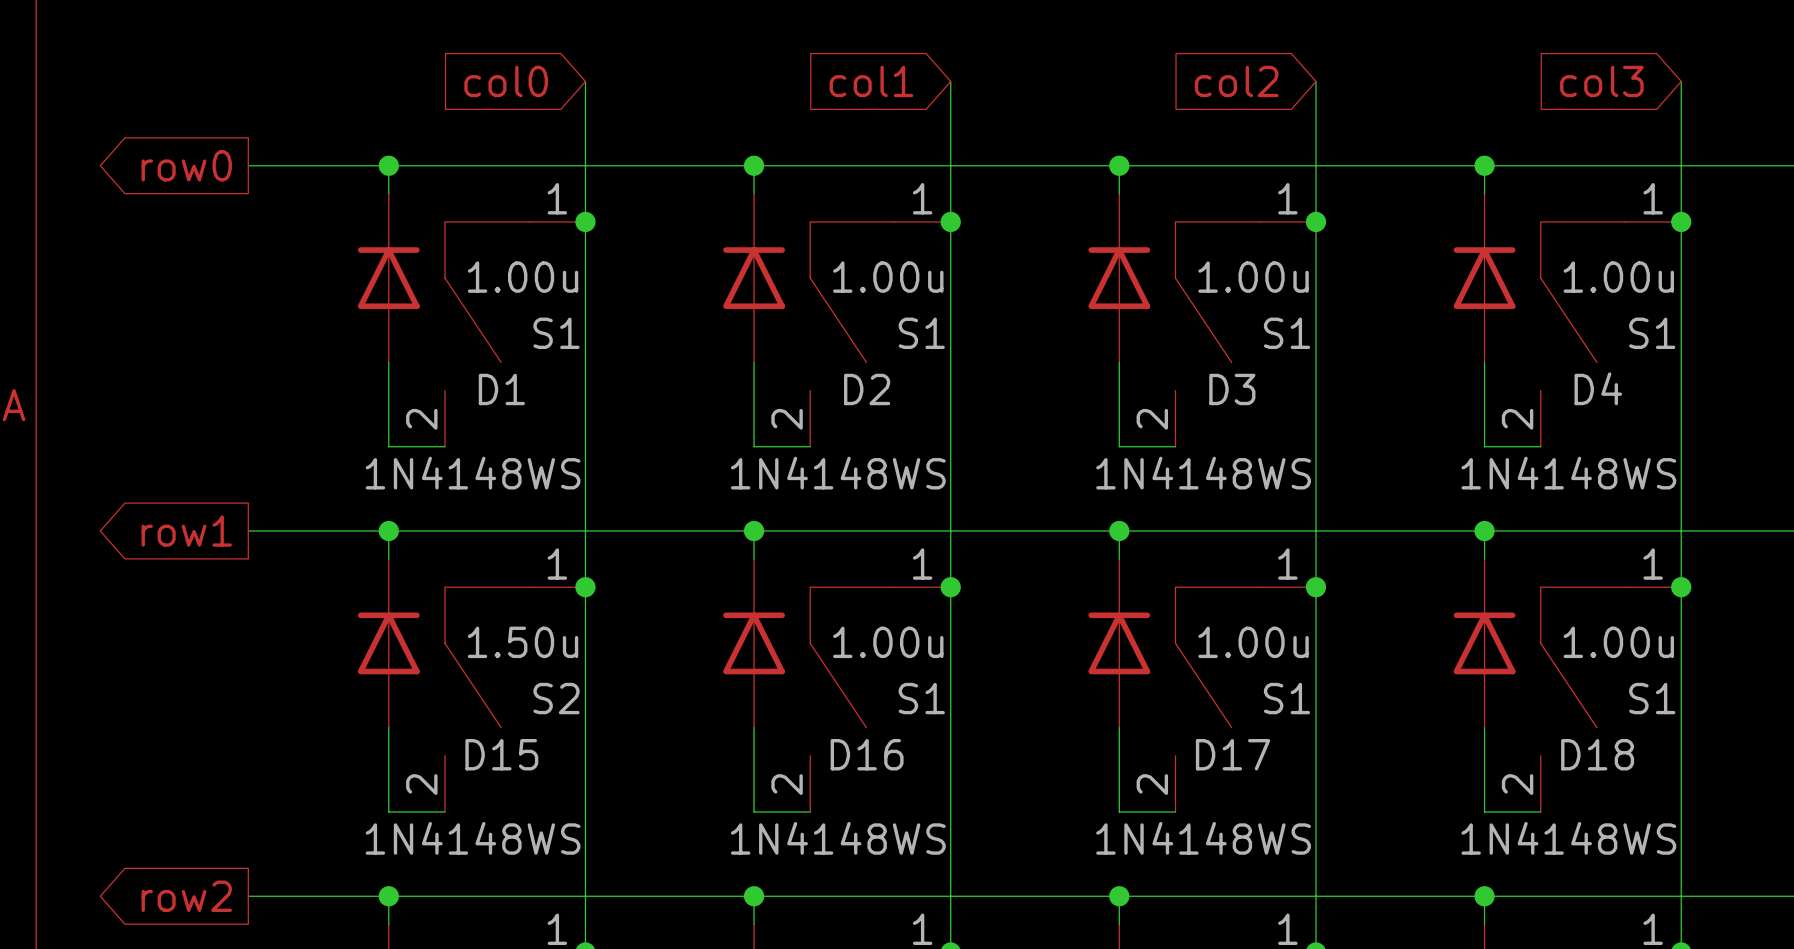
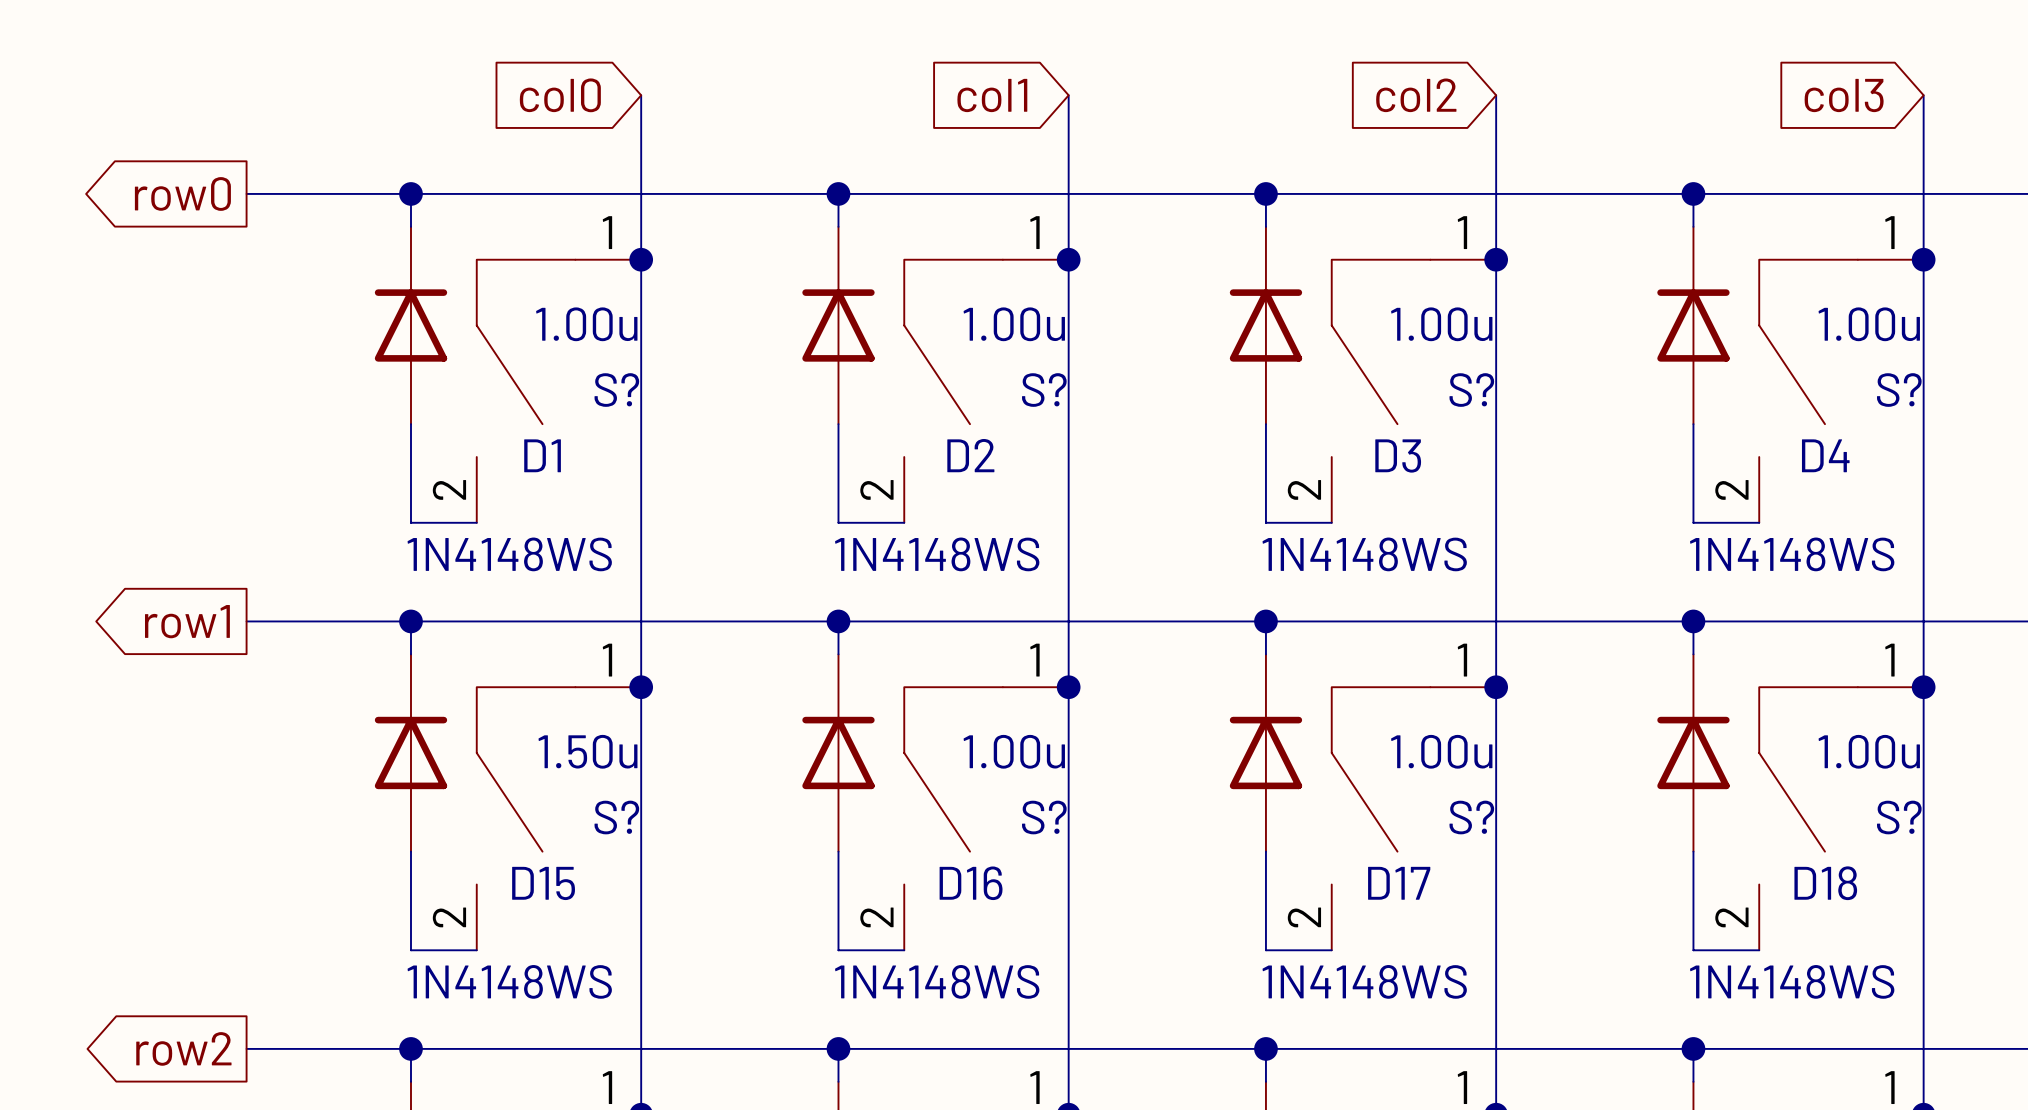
S1 name: S1 (556, 333) -> S? (616, 390)
S1 name: S1 (921, 333) -> S? (1044, 390)
S1 name: S1 (1287, 333) -> S? (1471, 390)
S1 name: S1 (1652, 333) -> S? (1899, 390)
S2 name: S2 (556, 698) -> S? (616, 817)
S1 name: S1 (921, 698) -> S? (1044, 817)
S1 name: S1 (1287, 698) -> S? (1471, 817)
S1 name: S1 (1652, 698) -> S? (1899, 817)

